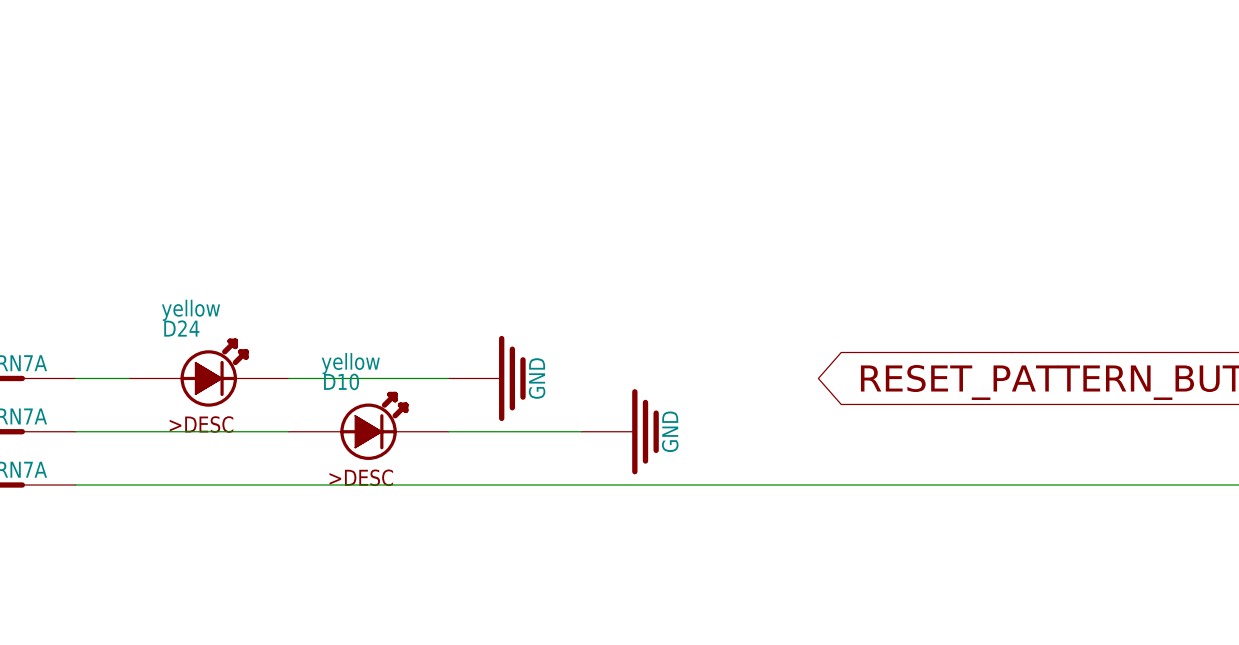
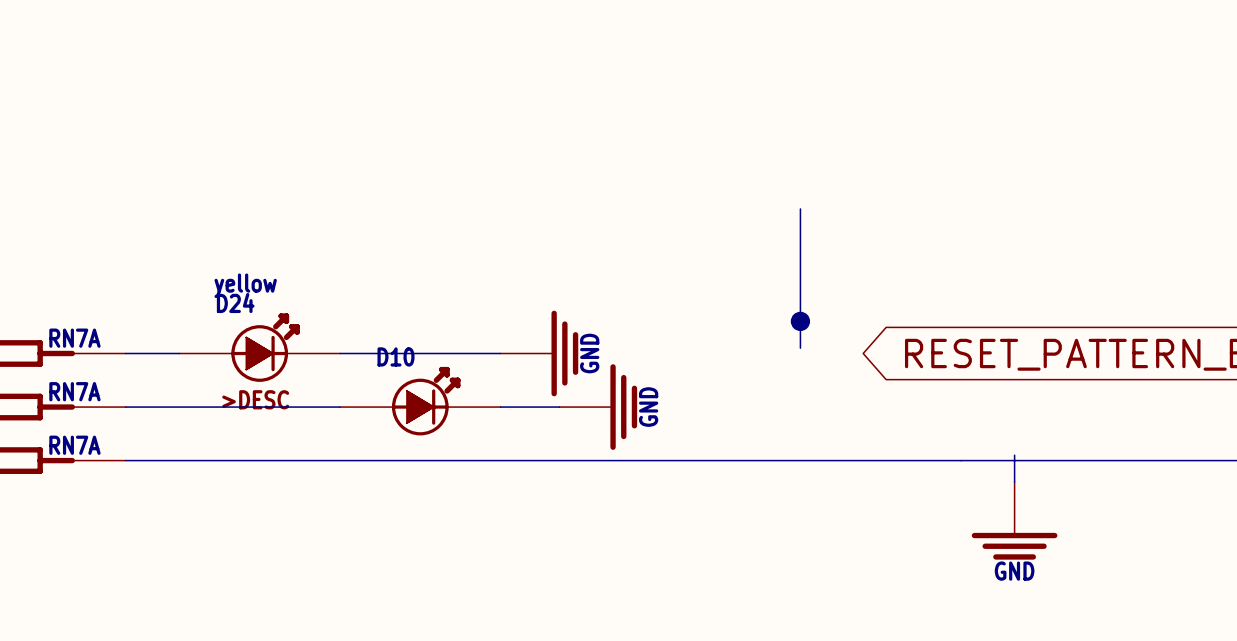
wire: none -> (800, 208) (800, 348)
junction: none -> (800, 321)
D10 value: yellow (350, 363) -> none
power symbol position: GND (620, 431) -> GND (598, 407)
D10 text: >DESC (361, 477) -> none
wire: none -> (1014, 455) (1014, 482)
power symbol: none -> GND (1014, 520)

